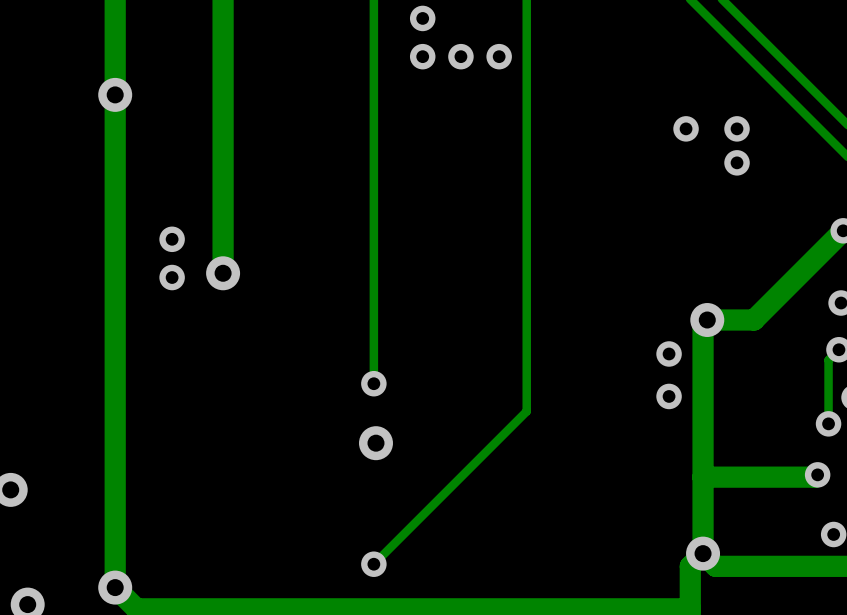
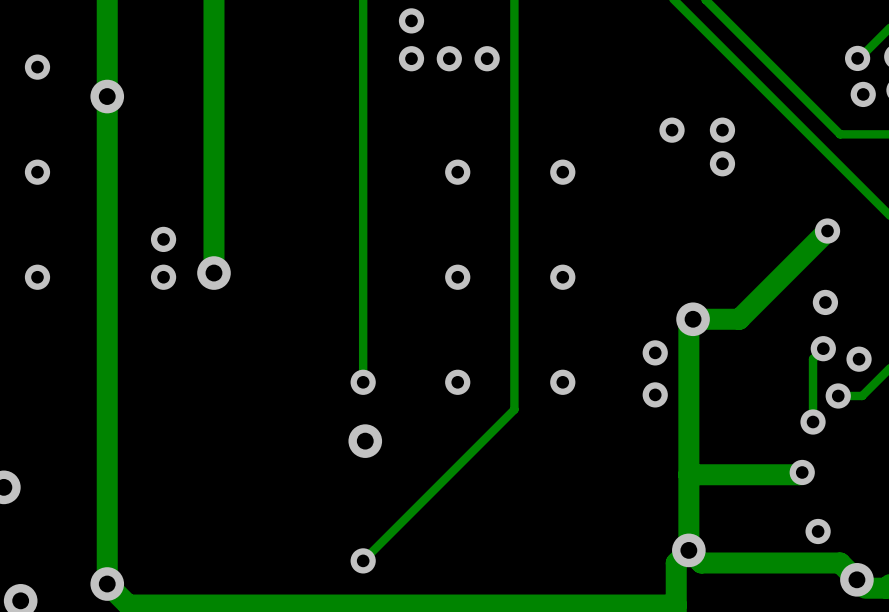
via: none -> (37, 67)
via: none -> (37, 172)
via: none -> (457, 172)
via: none -> (562, 172)
via: none -> (37, 277)
via: none -> (457, 277)
via: none -> (562, 277)
via: none -> (457, 382)
via: none -> (562, 382)

